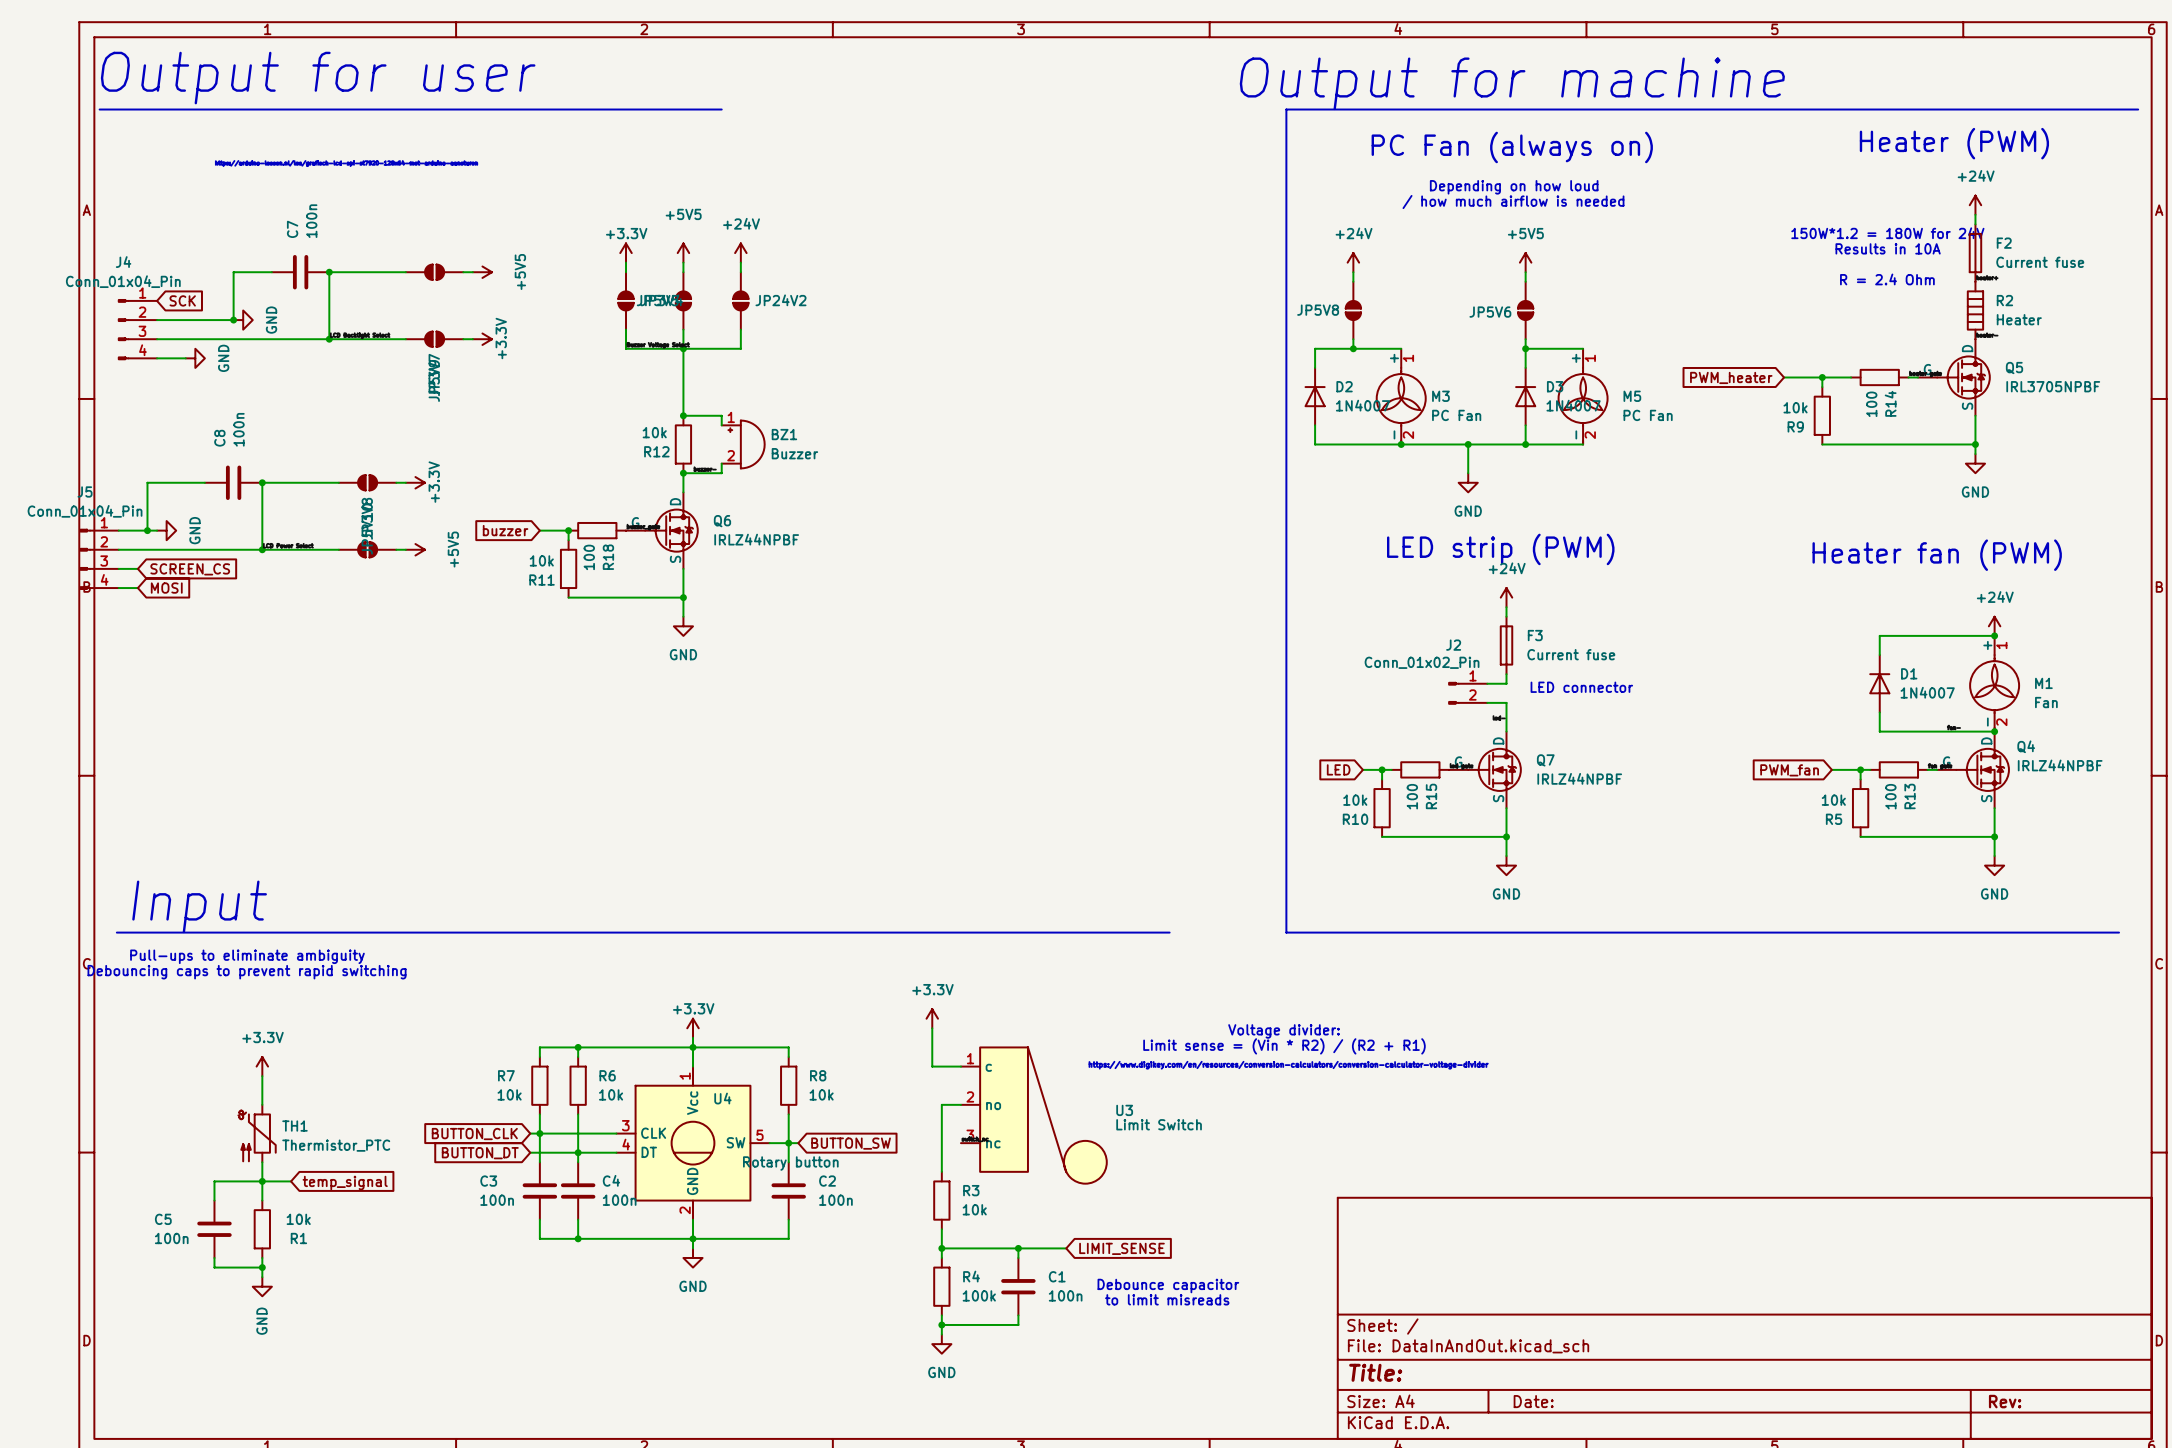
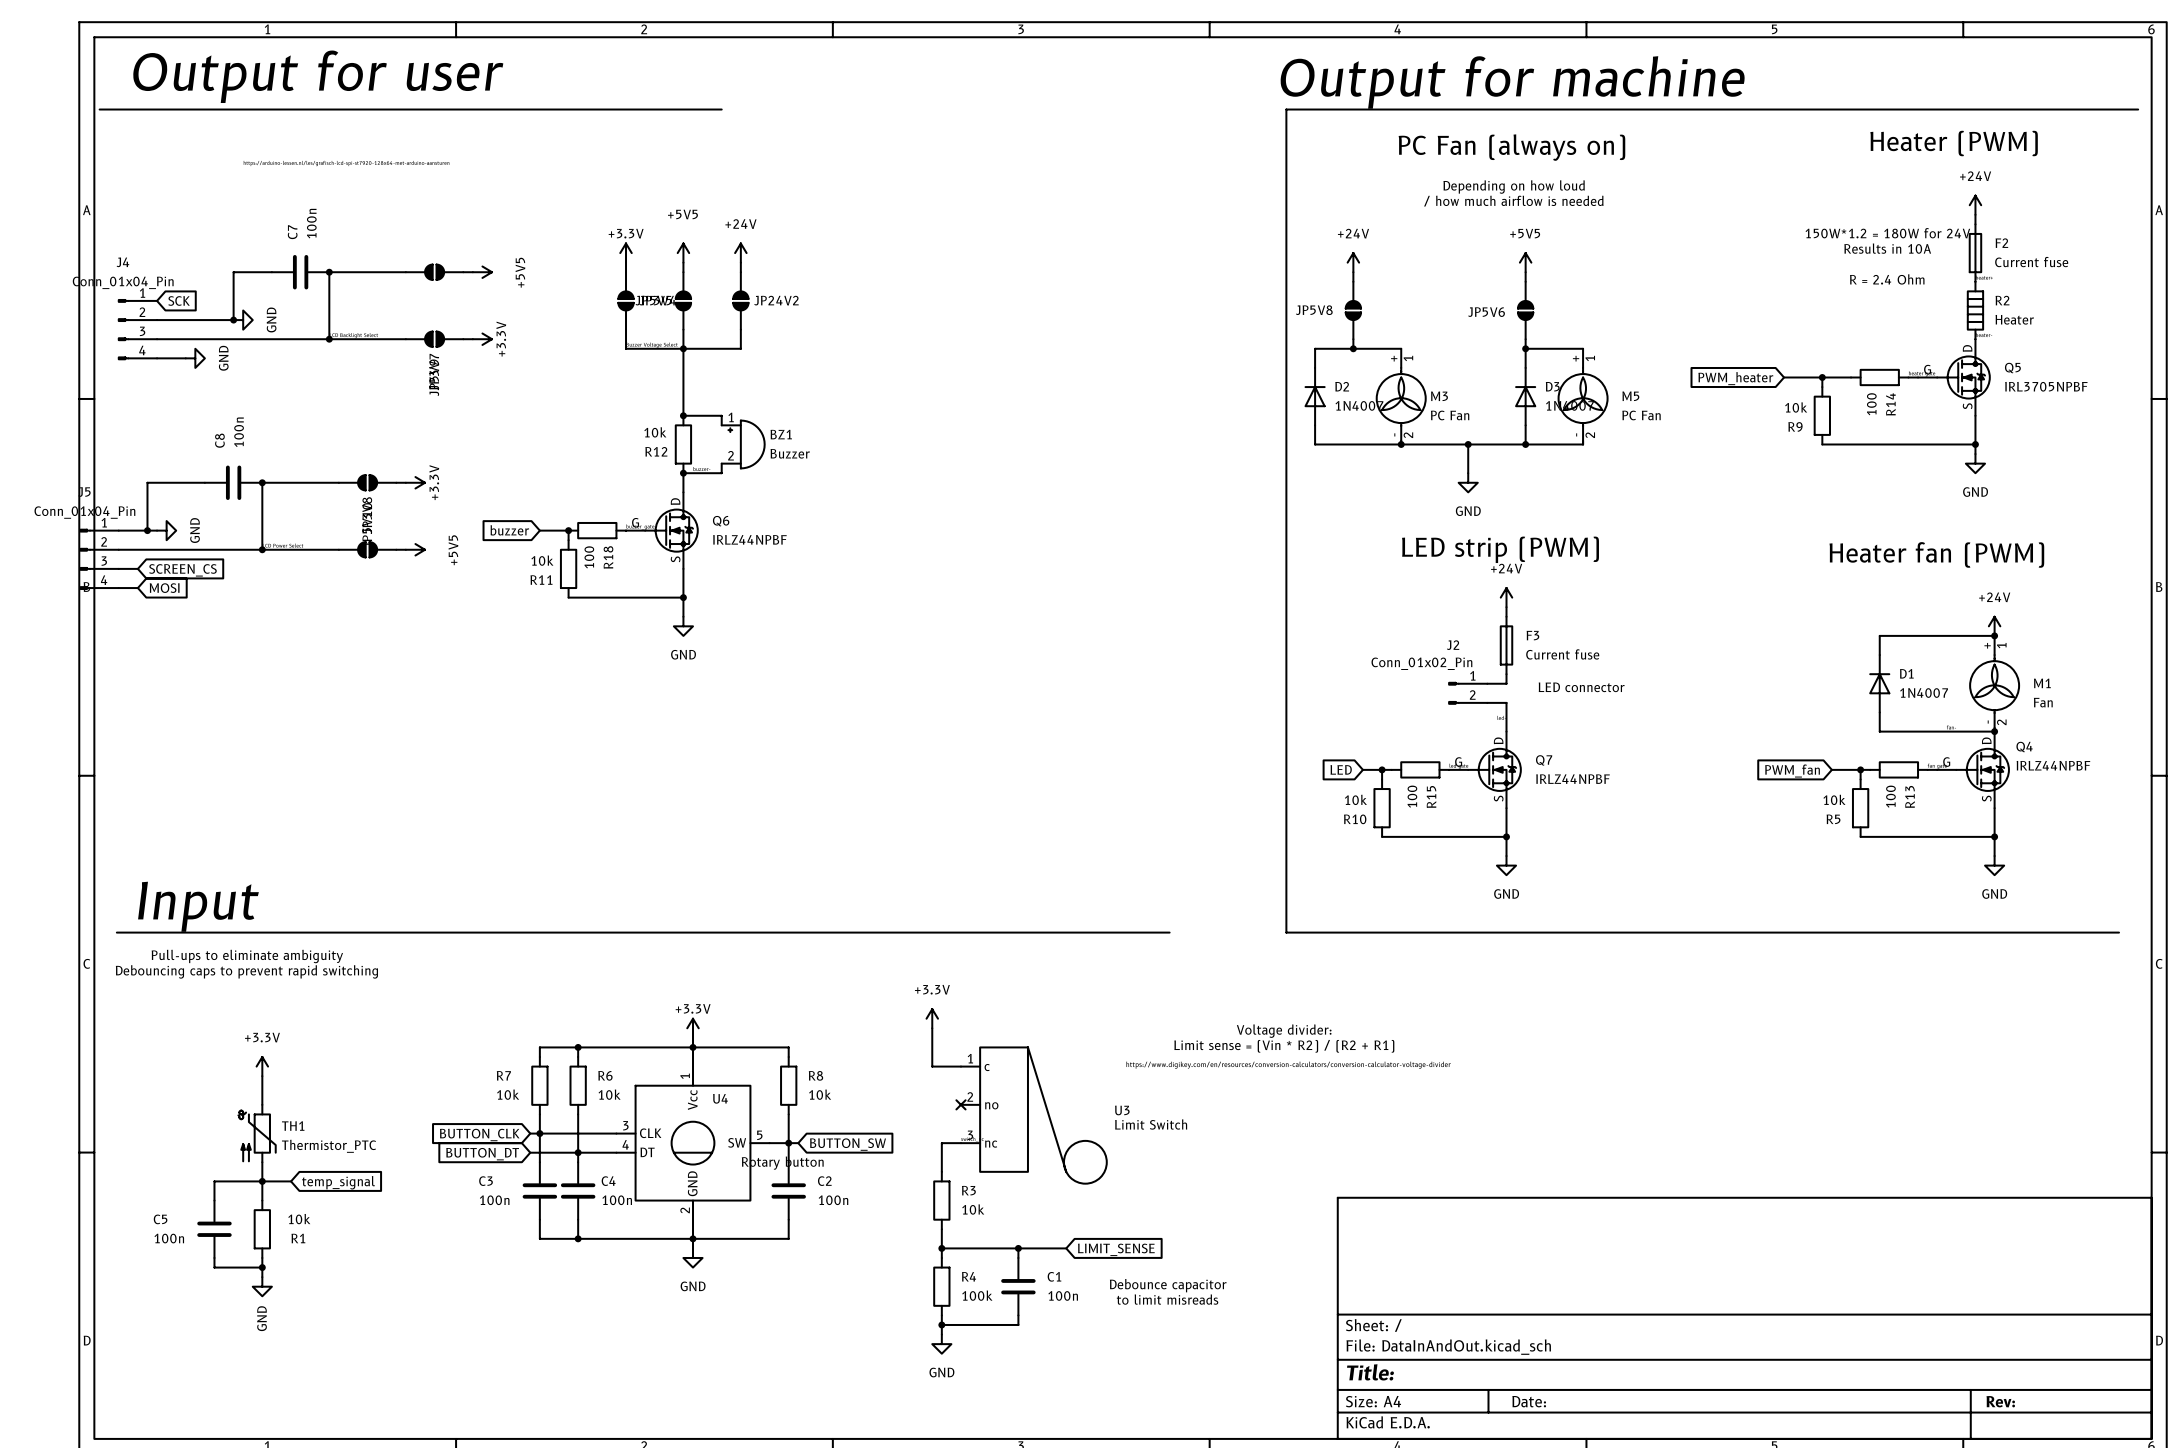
wire: (960, 1104) (941, 1104) (941, 1143) -> (960, 1143) (941, 1143)
no-connect mark: none -> (960, 1104)

